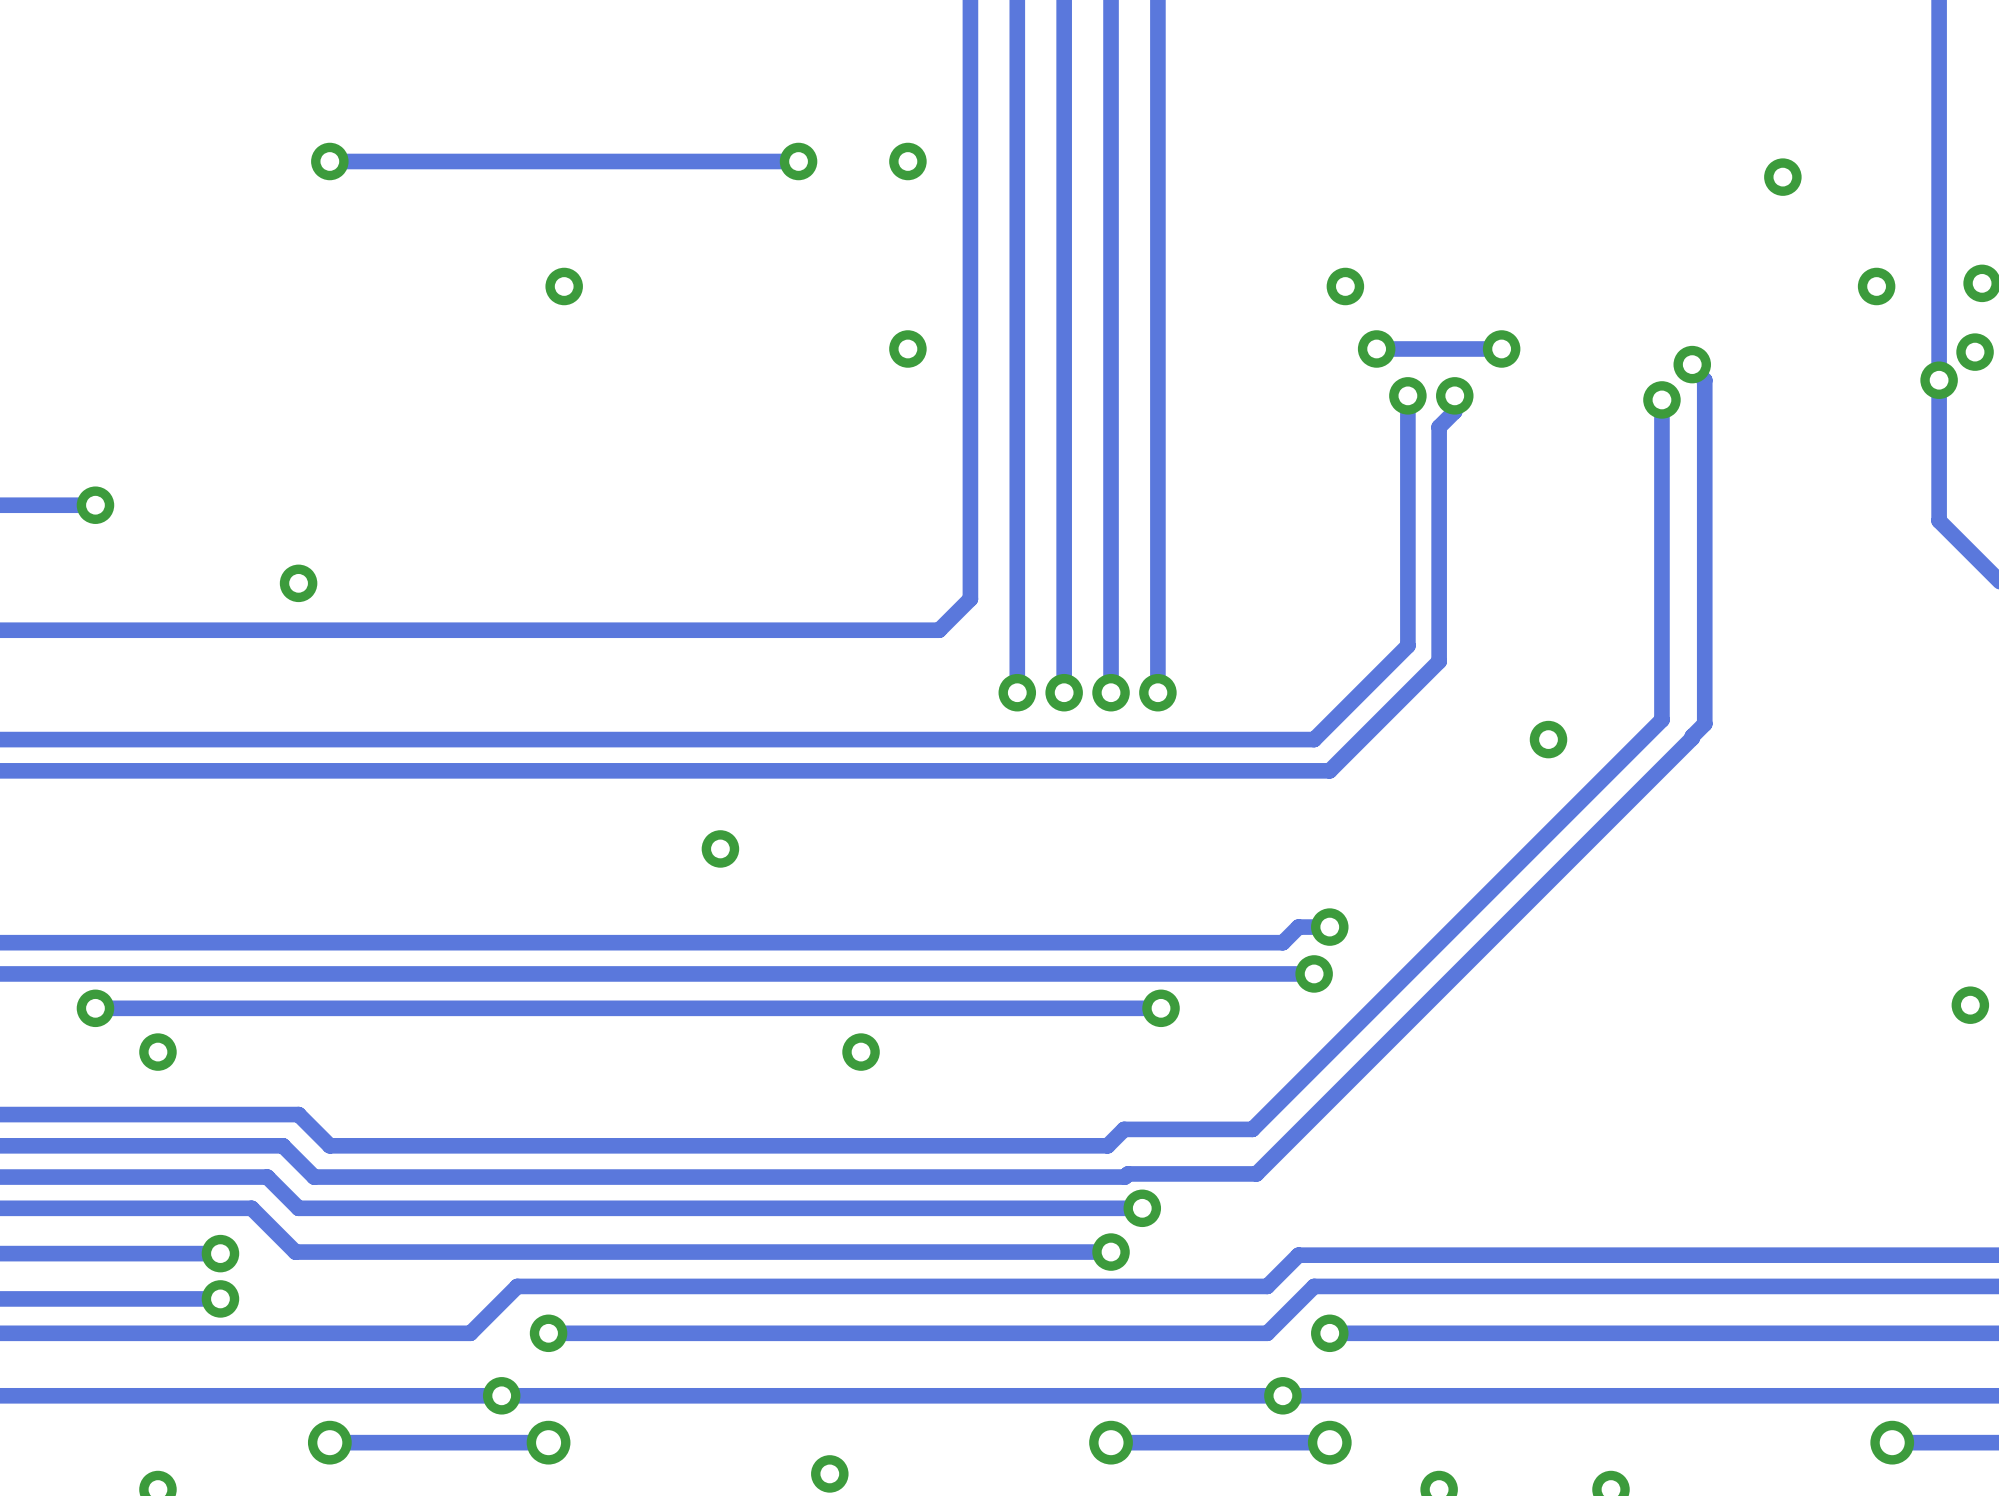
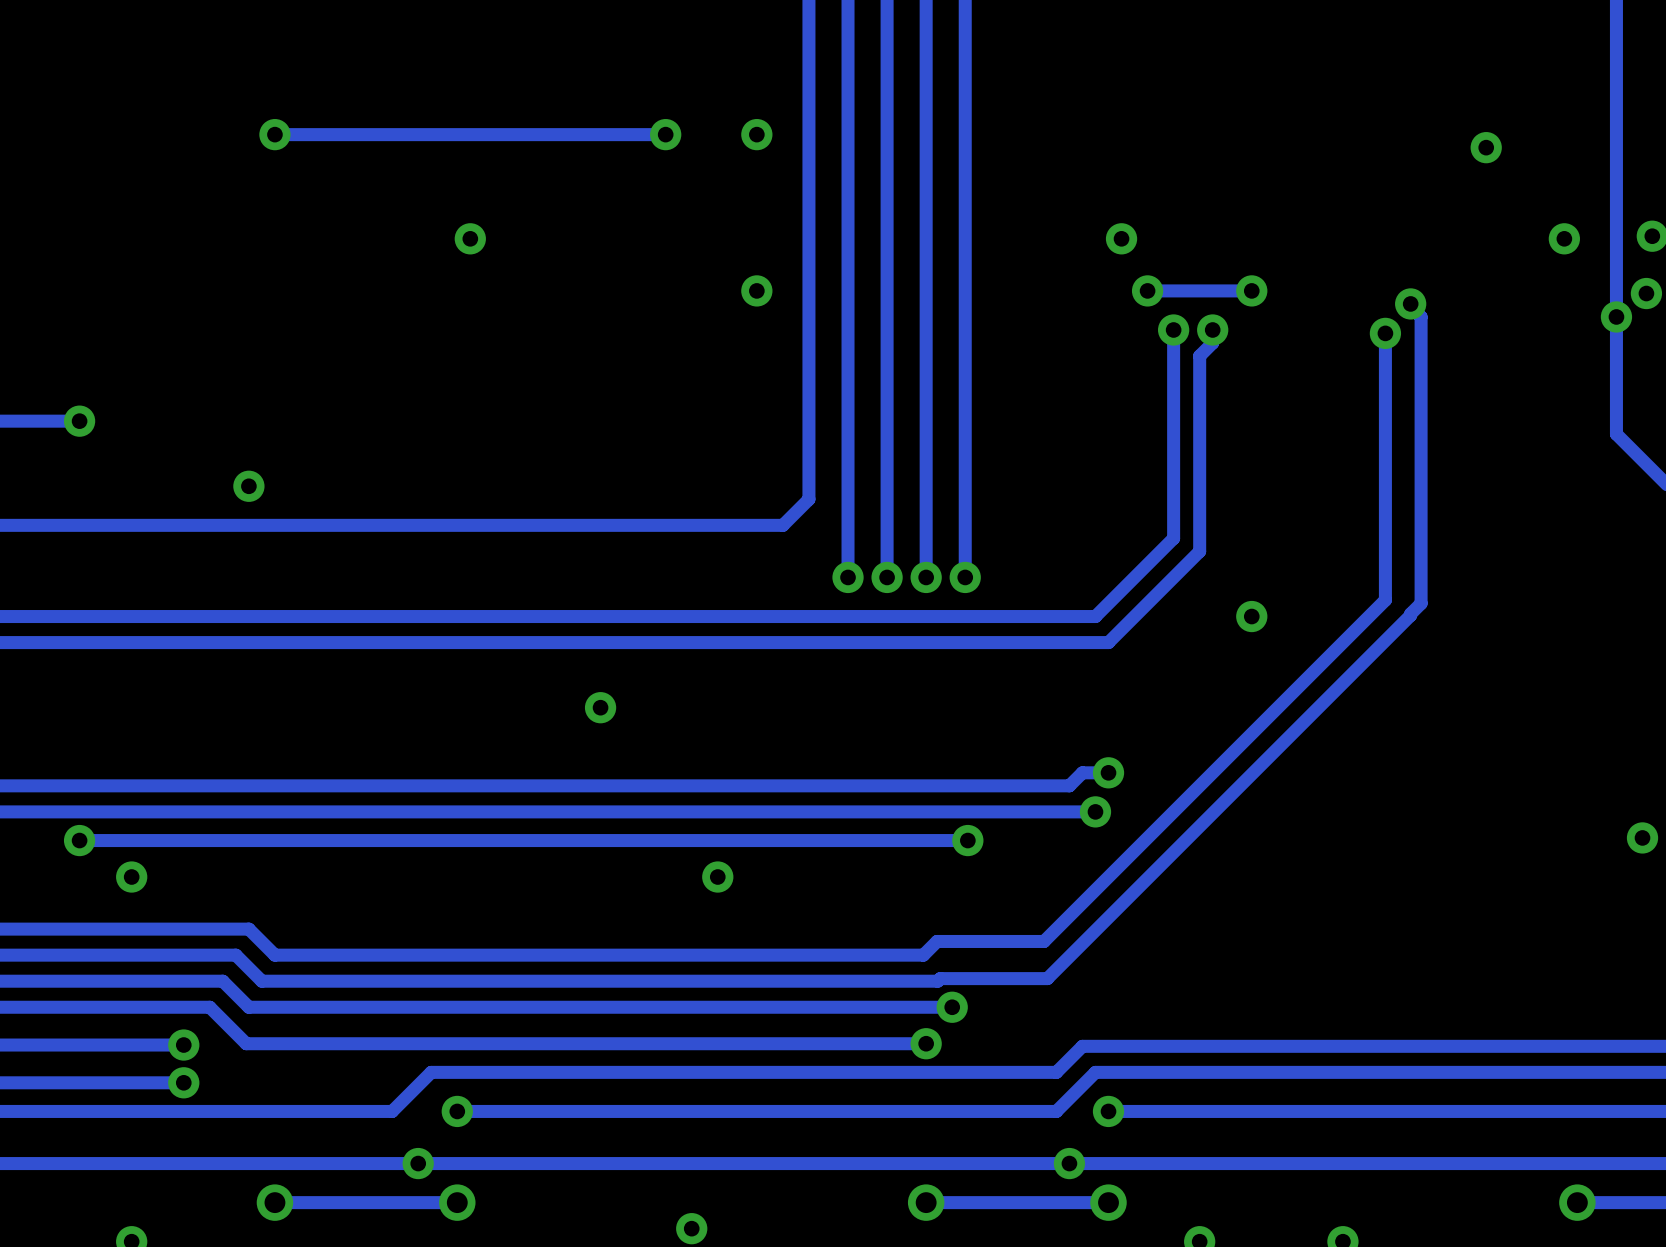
via position: (1548, 739) -> (1251, 616)

